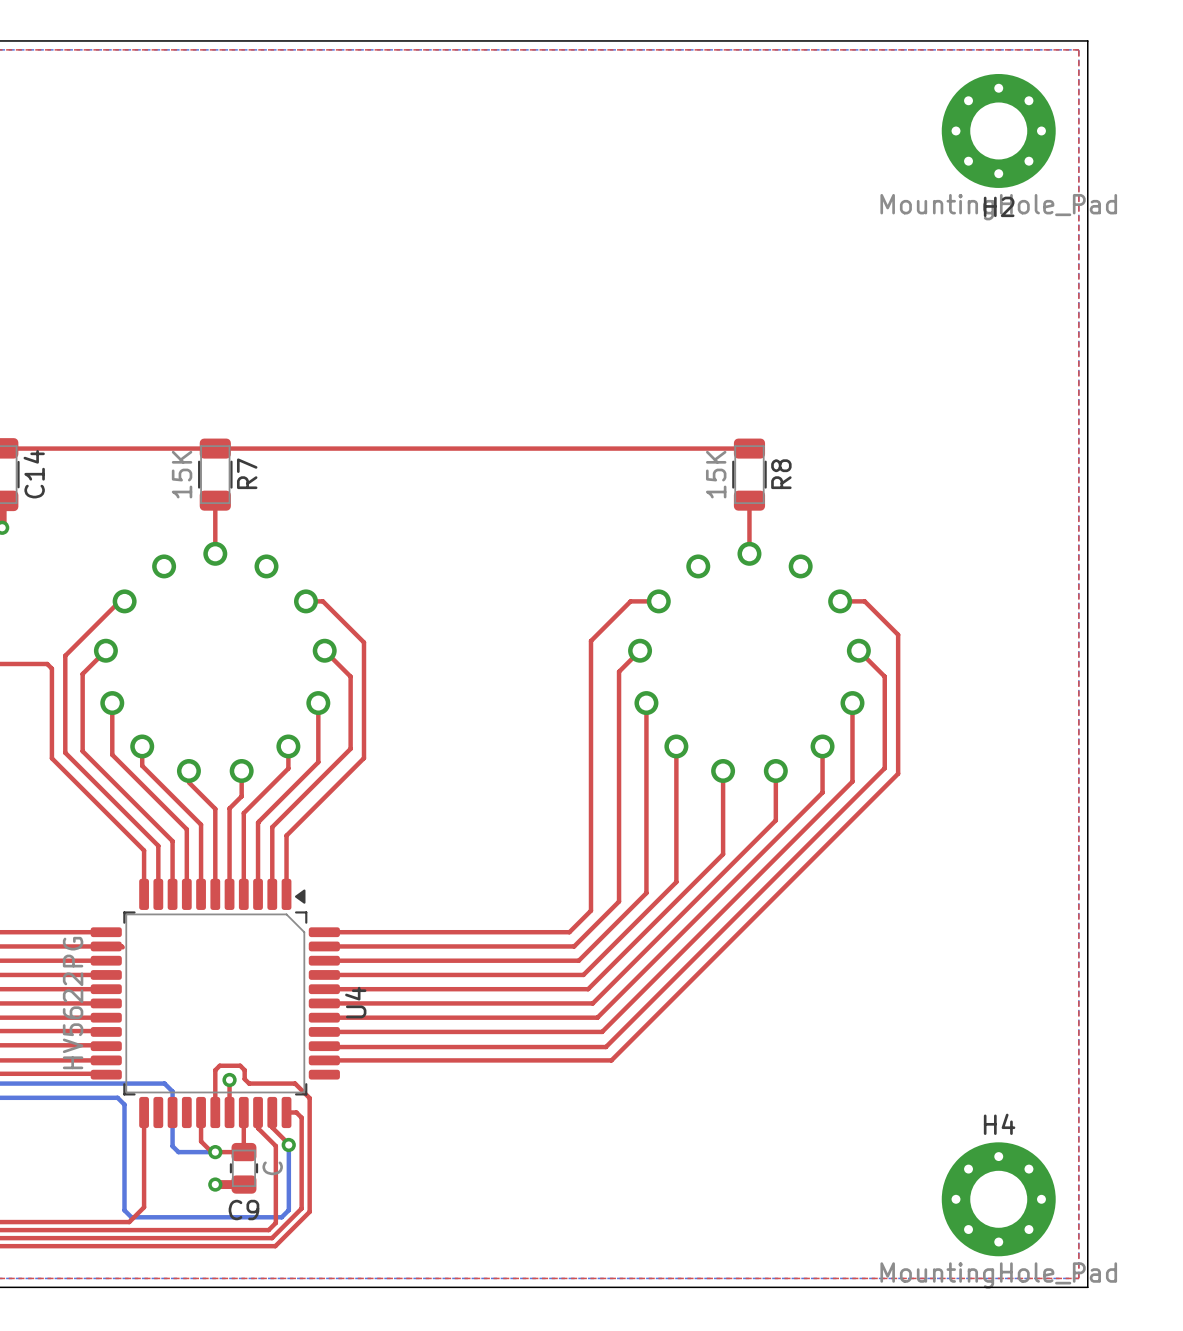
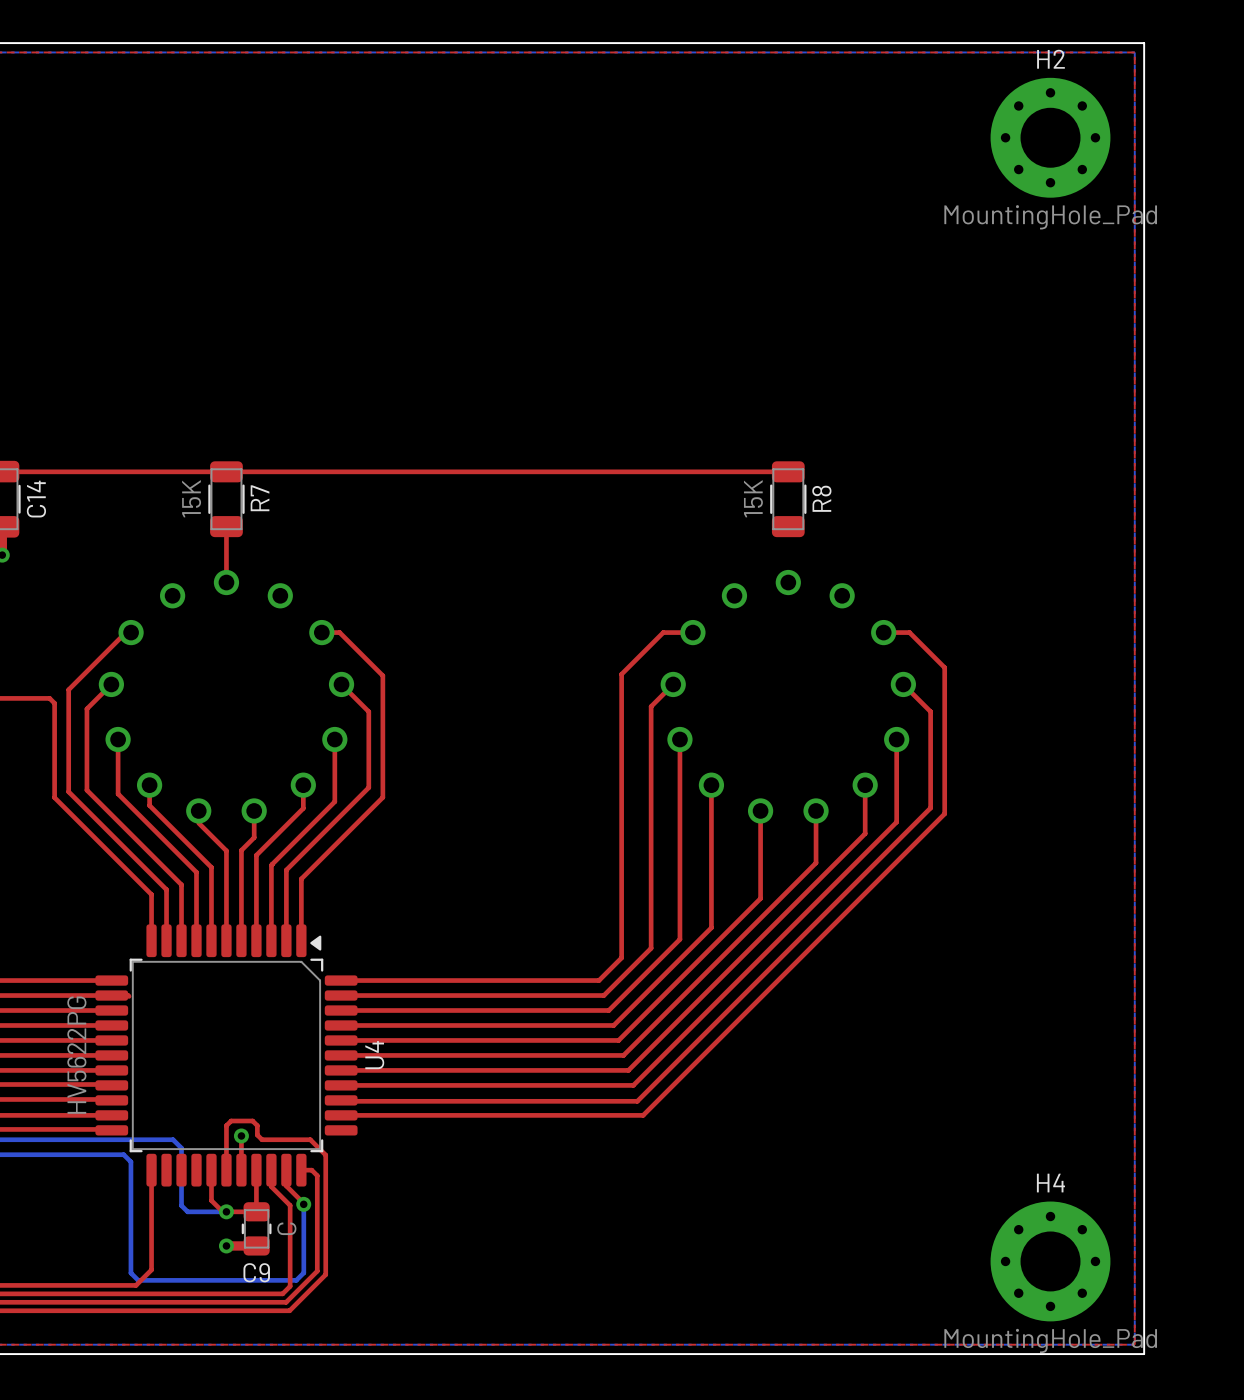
H2 name position: H2 (999, 206) -> H2 (1050, 59)
top track: (749, 500) (749, 553) -> none

